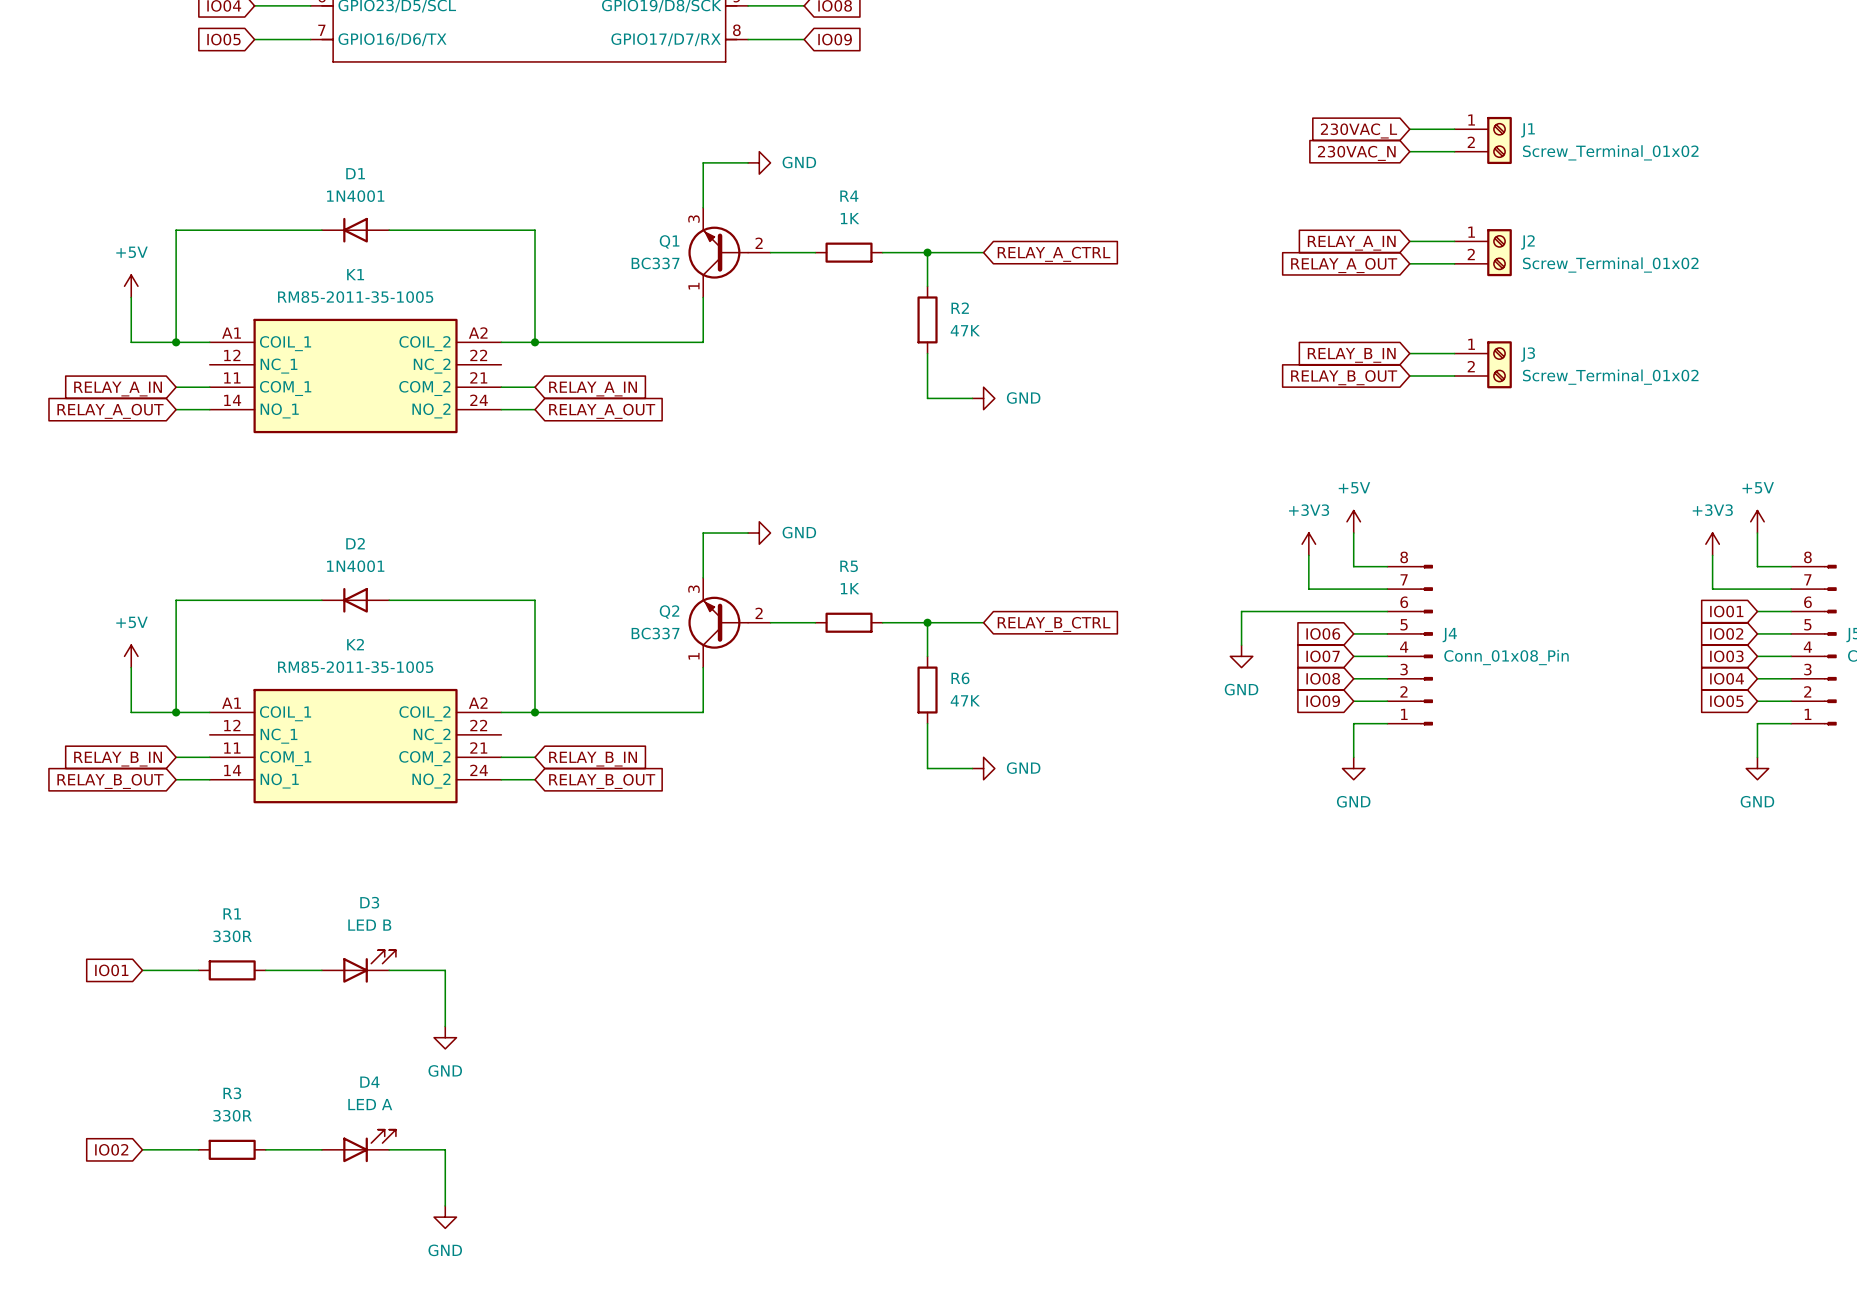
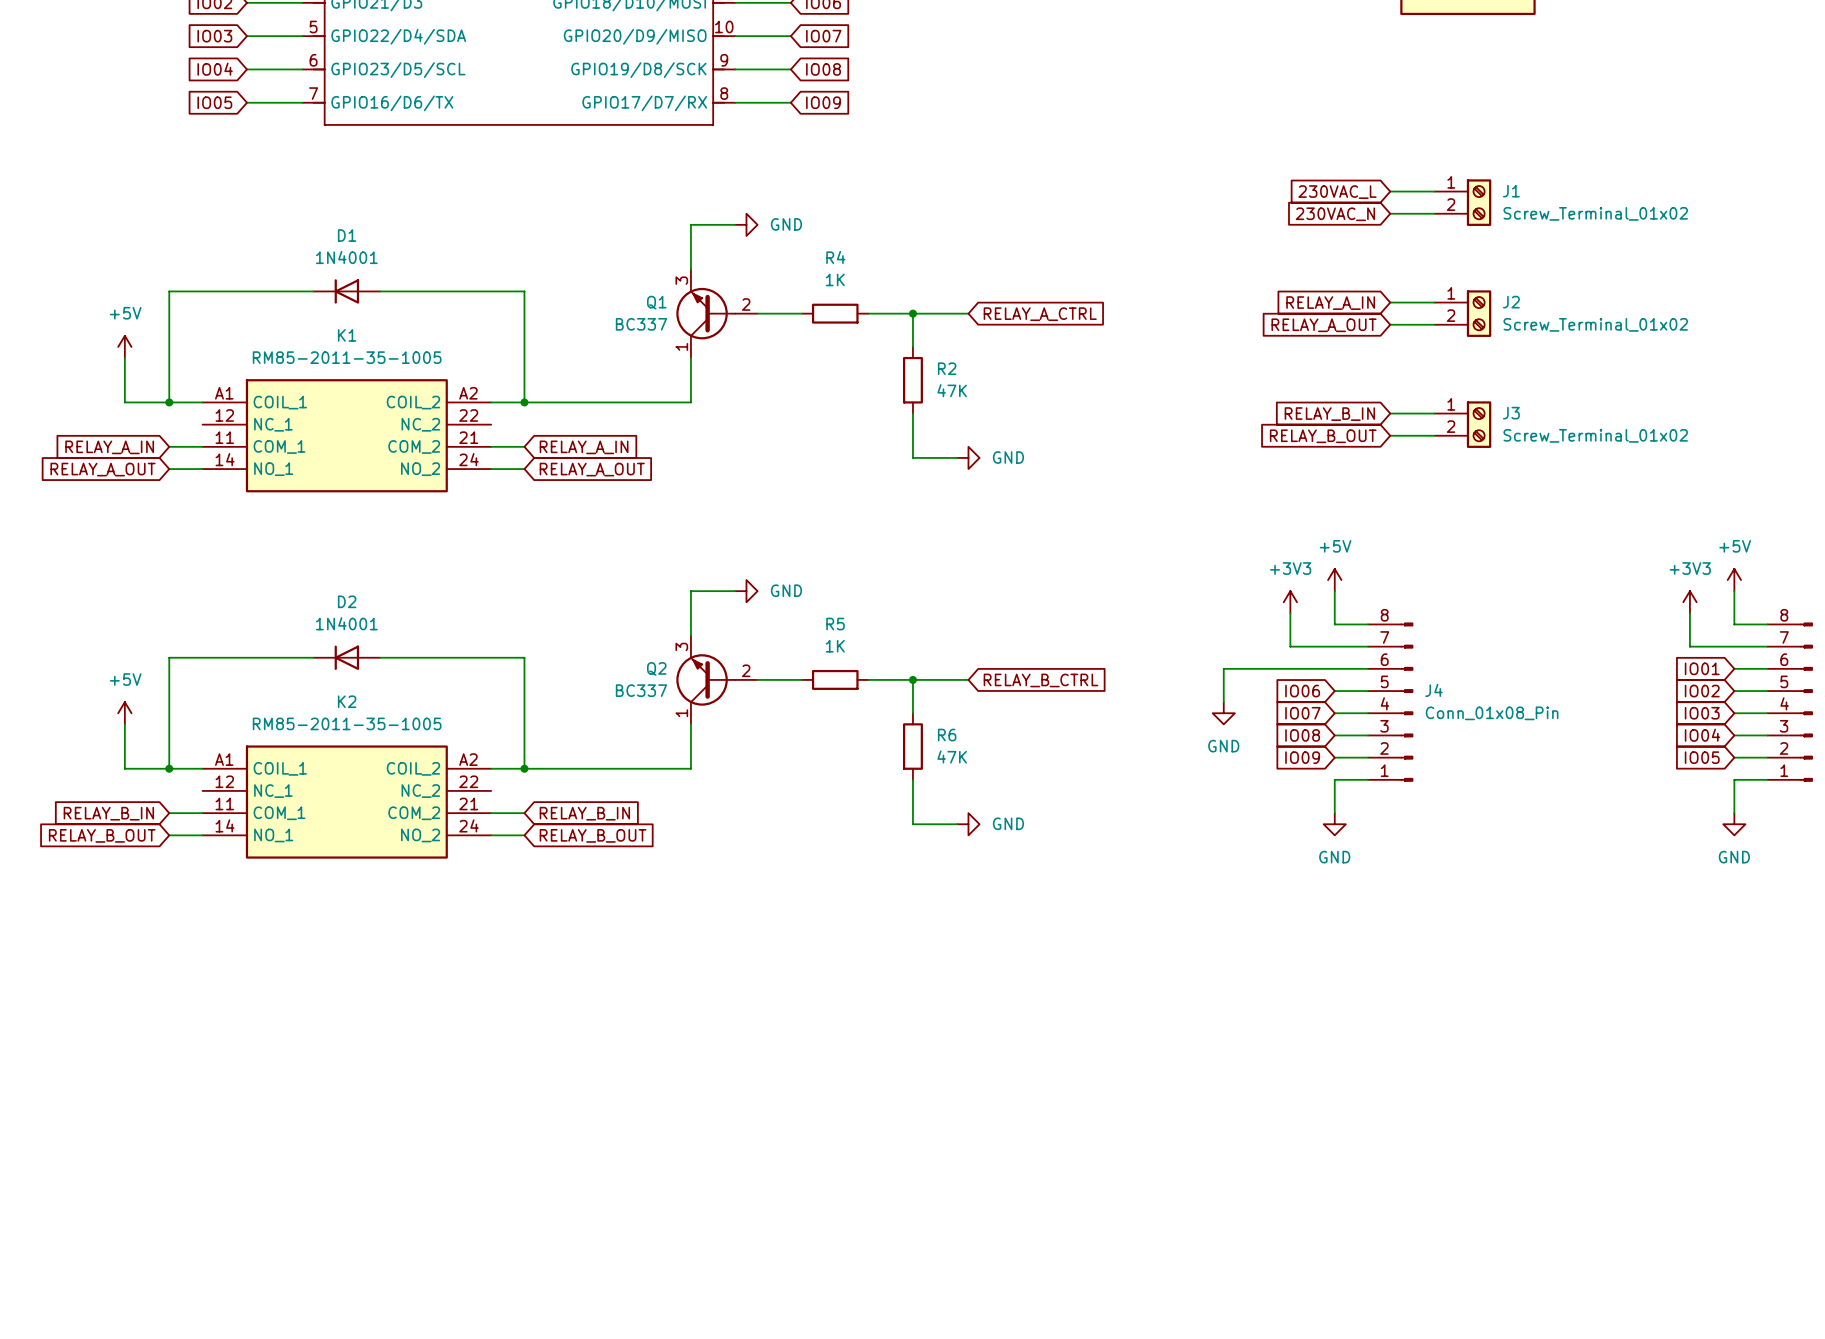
D3: LED B (358, 966) -> none
global label: IO01 (111, 970) -> none
wire: (142, 970) (198, 970) -> none
R1: 330R (232, 970) -> none
wire: (265, 970) (321, 970) -> none
wire: (389, 970) (445, 970) (445, 1026) -> none
power symbol: GND (445, 1037) -> none
D4: LED A (358, 1145) -> none
global label: IO02 (111, 1149) -> none
wire: (142, 1149) (198, 1149) -> none
R3: 330R (232, 1149) -> none
wire: (265, 1149) (321, 1149) -> none
wire: (389, 1149) (445, 1149) (445, 1205) -> none
power symbol: GND (445, 1217) -> none

